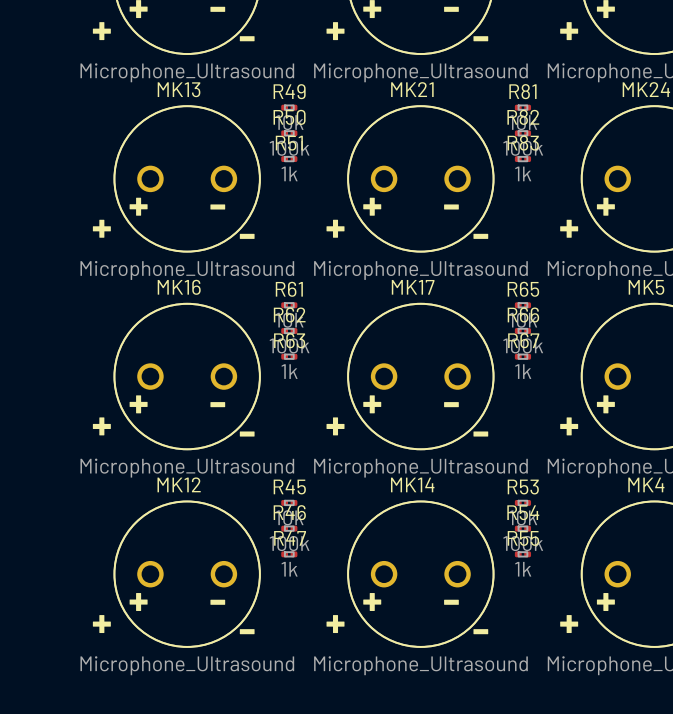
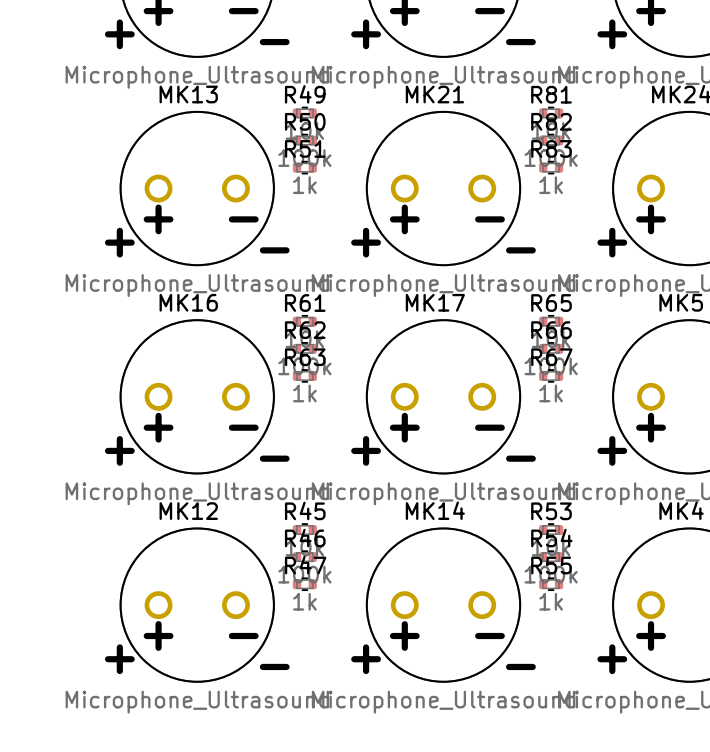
R49 footprint: [281, 104, 298, 111] -> [292, 106, 317, 121]
R81 footprint: [514, 104, 532, 111] -> [539, 106, 564, 121]
R50 footprint: [281, 130, 298, 137] -> [292, 133, 317, 148]
R82 footprint: [514, 130, 532, 137] -> [539, 133, 564, 148]
R51 footprint: [281, 156, 298, 163] -> [292, 160, 317, 175]
R83 footprint: [514, 156, 532, 163] -> [539, 160, 564, 175]
R61 footprint: [281, 302, 298, 309] -> [292, 314, 317, 329]
R65 footprint: [514, 302, 532, 309] -> [539, 314, 564, 329]
R62 footprint: [281, 328, 298, 334] -> [292, 342, 317, 356]
R66 footprint: [514, 328, 532, 334] -> [539, 342, 564, 356]
R63 footprint: [281, 353, 298, 360] -> [292, 369, 317, 383]
R67 footprint: [514, 353, 532, 360] -> [539, 369, 564, 383]
R45 footprint: [281, 499, 298, 506] -> [292, 523, 317, 537]
R53 footprint: [514, 499, 532, 506] -> [539, 523, 564, 537]
R46 footprint: [281, 525, 298, 532] -> [292, 550, 317, 564]
R54 footprint: [514, 525, 532, 532] -> [539, 550, 564, 564]
R47 footprint: [281, 551, 298, 558] -> [292, 577, 317, 592]
R55 footprint: [514, 551, 532, 558] -> [539, 577, 564, 592]

